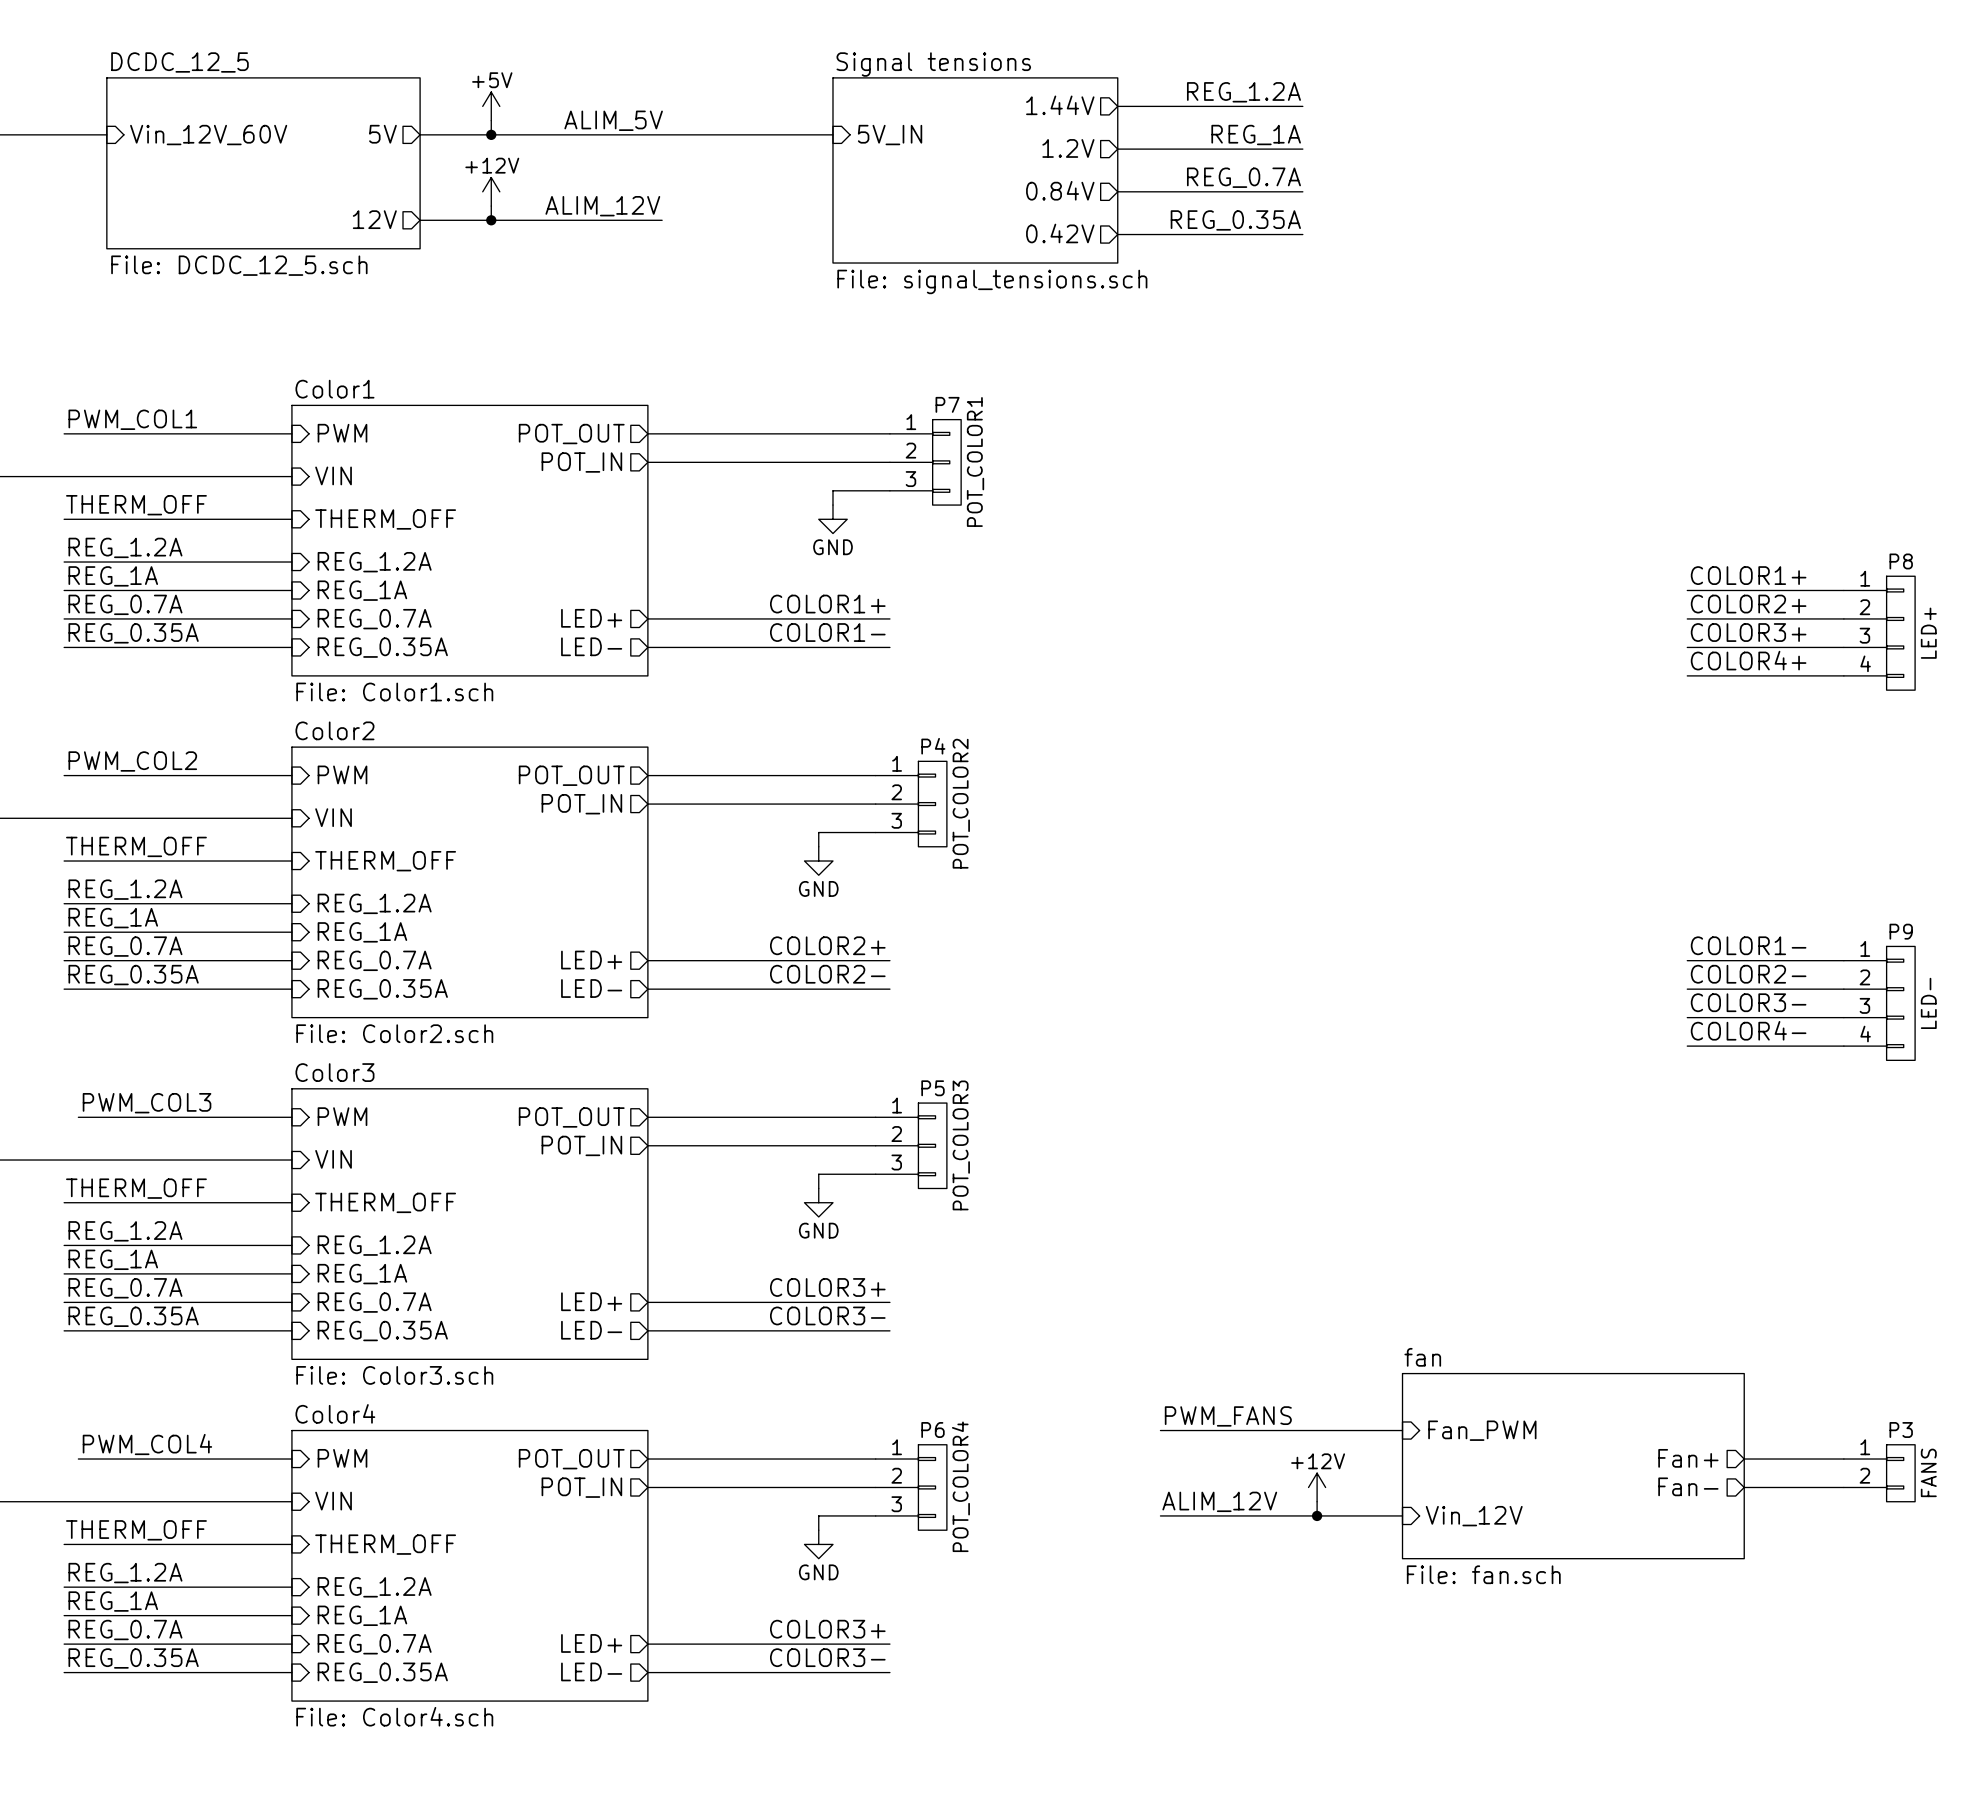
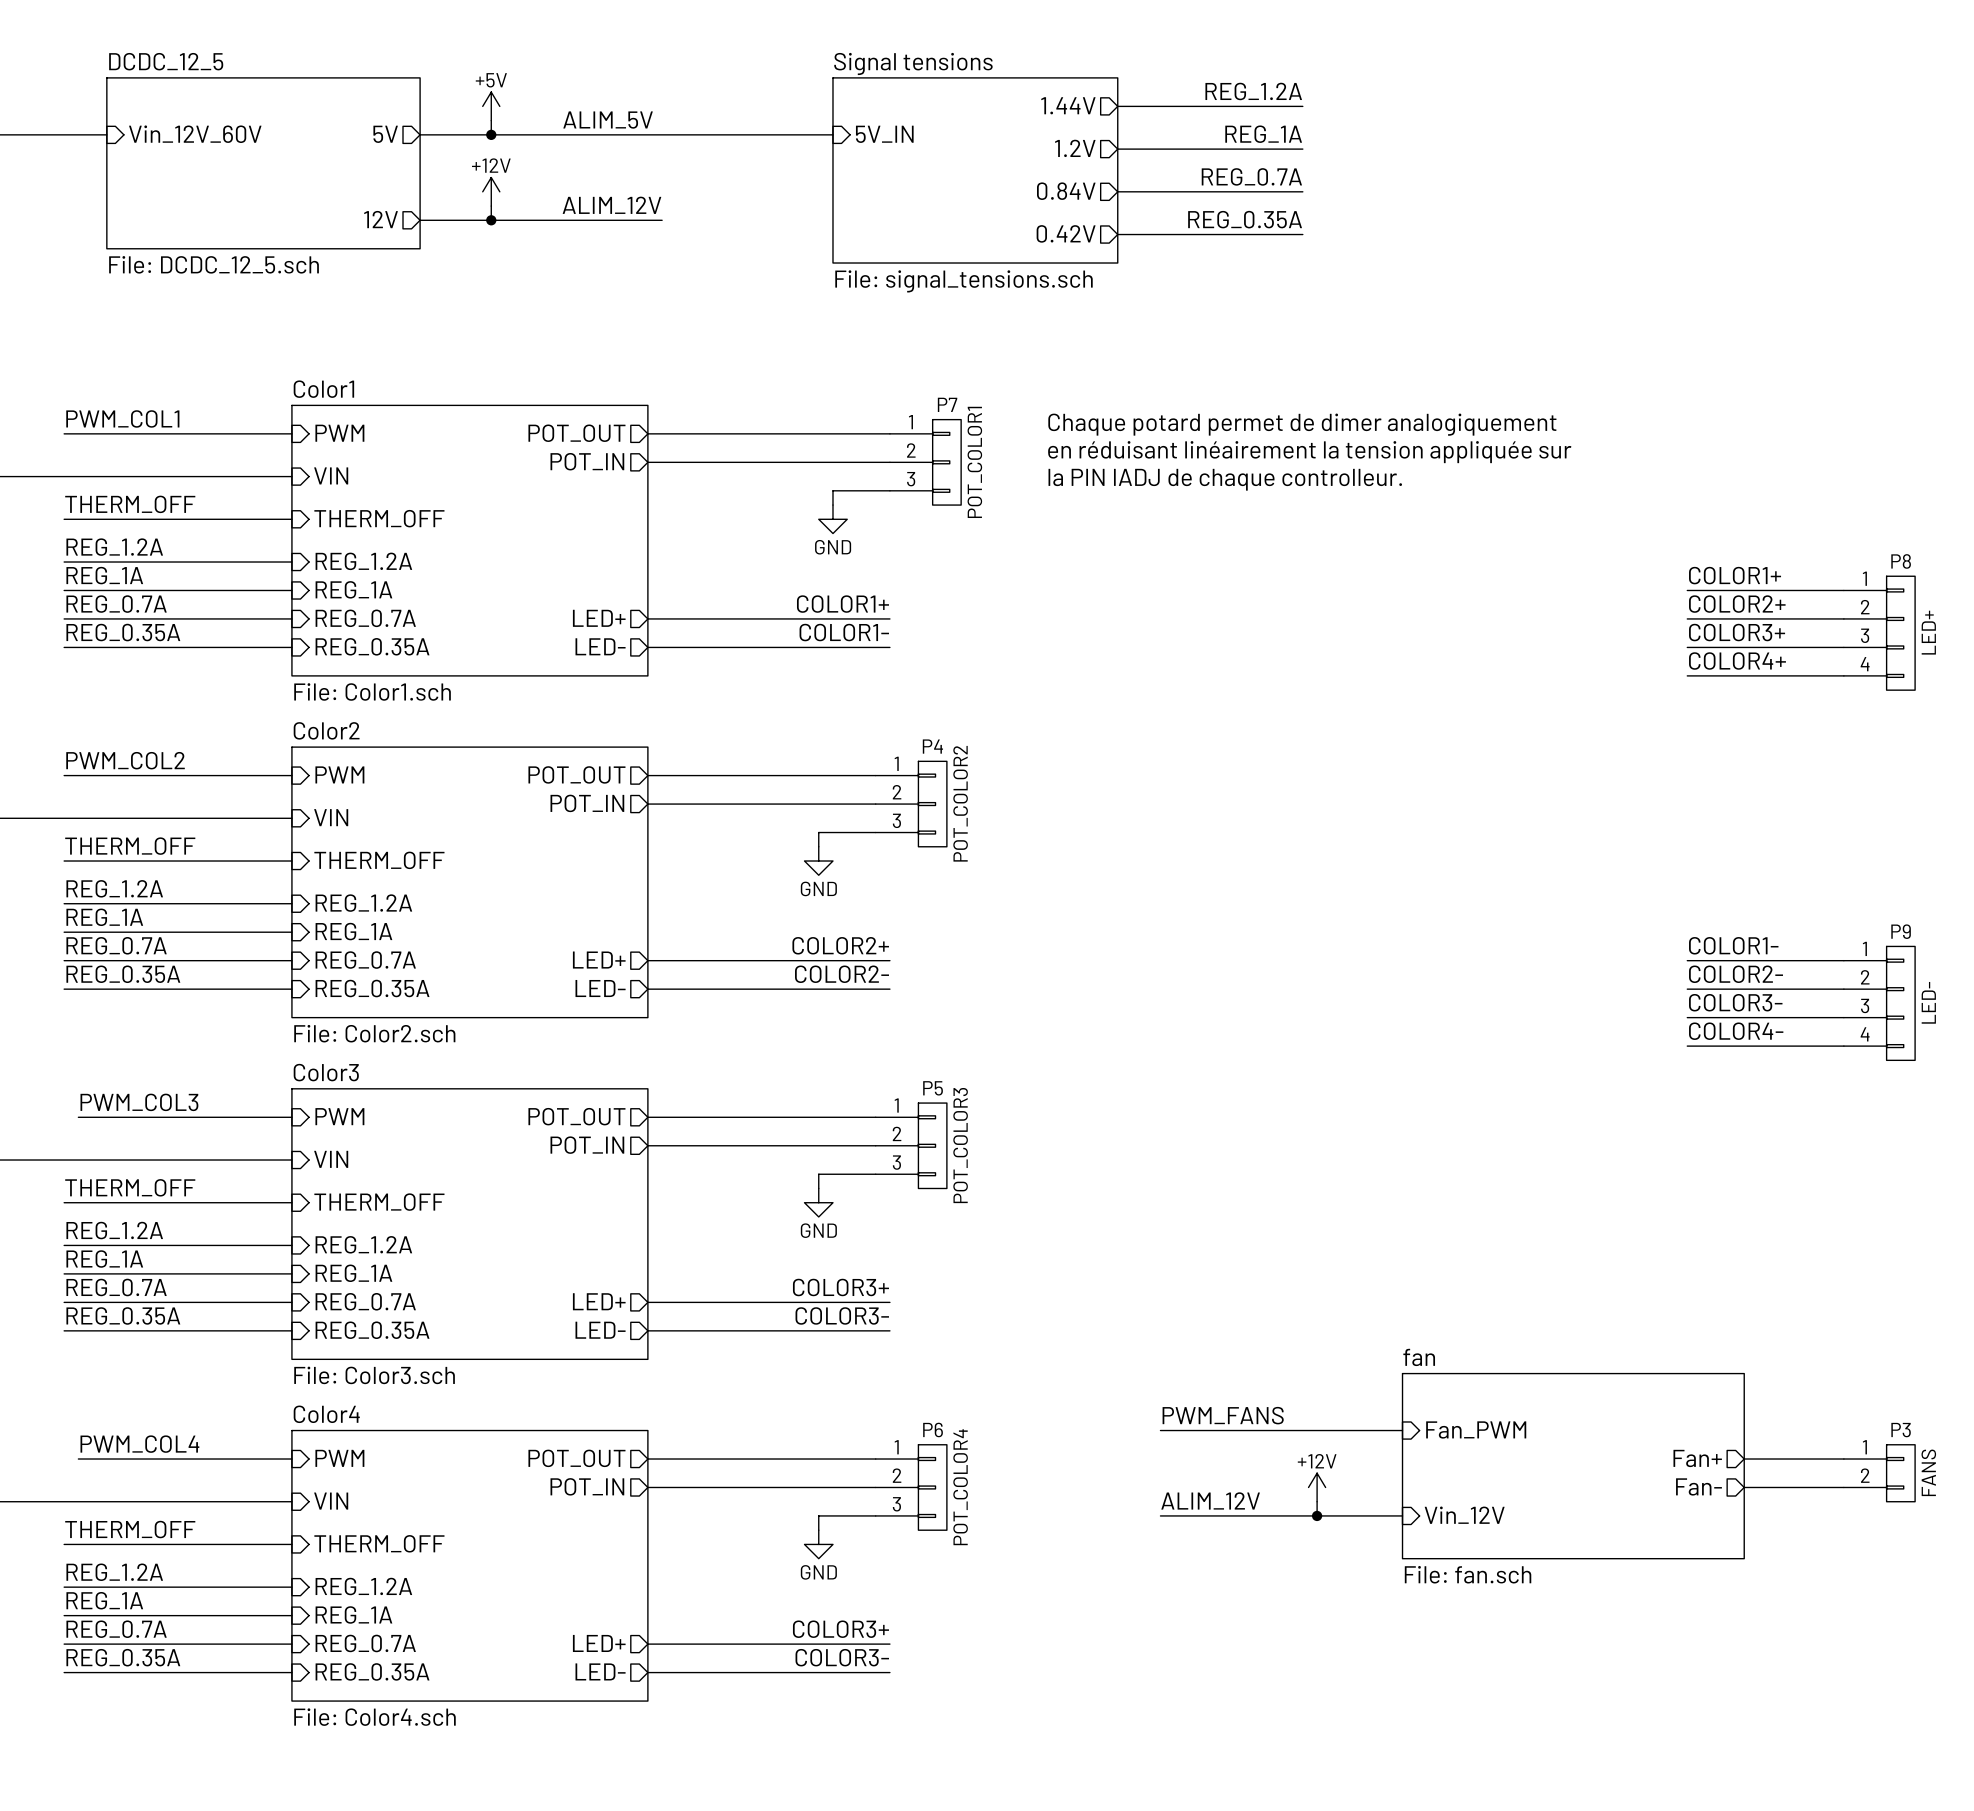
text: none -> Chaque potard permet de dimer analogiquement (1302, 424)
text: none -> en réduisant linéairement la tension appliquée sur (1309, 452)
text: none -> la PIN IADJ de chaque controlleur. (1225, 479)

